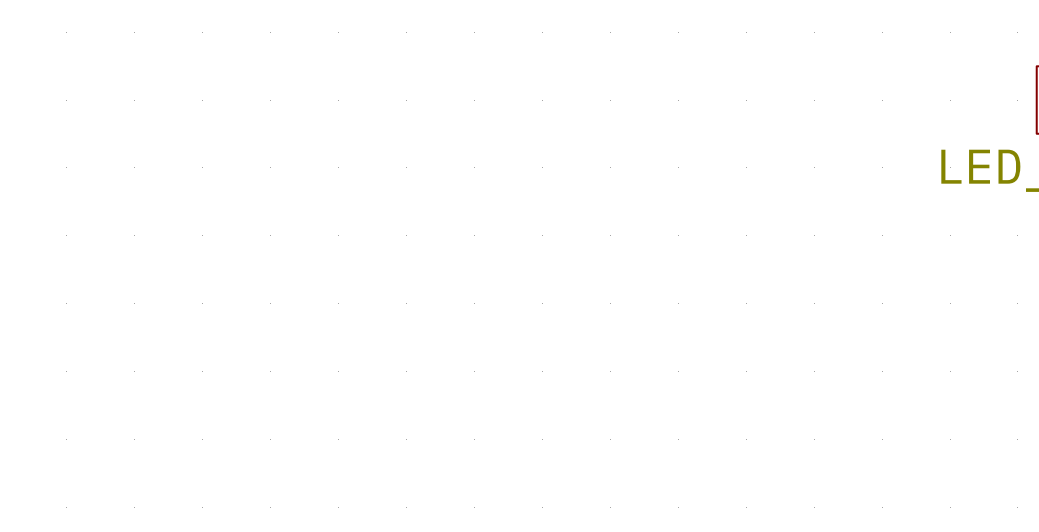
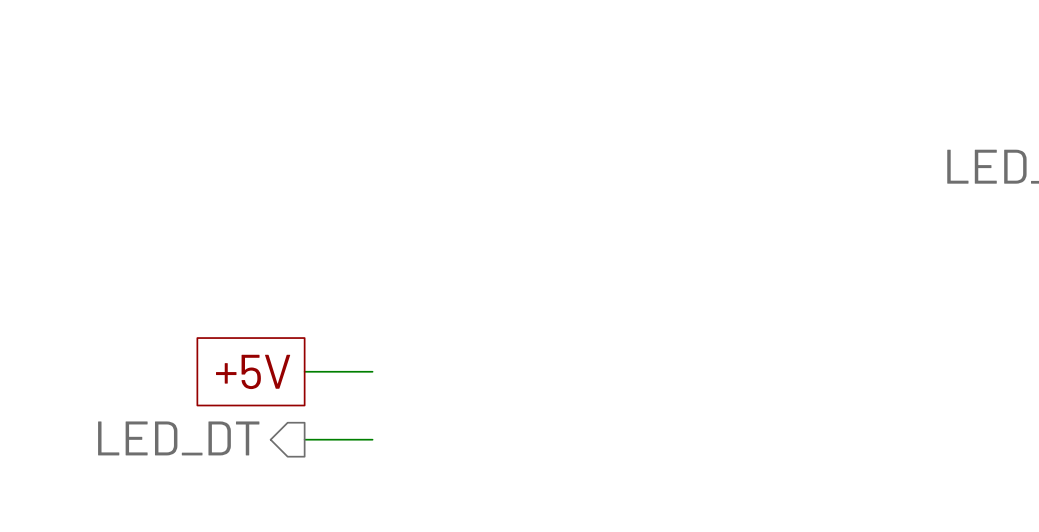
wire: none -> (304, 371) (372, 371)
global label: none -> +5V (253, 371)
wire: none -> (304, 439) (372, 439)
hierarchical label: none -> LED_DT (178, 438)

